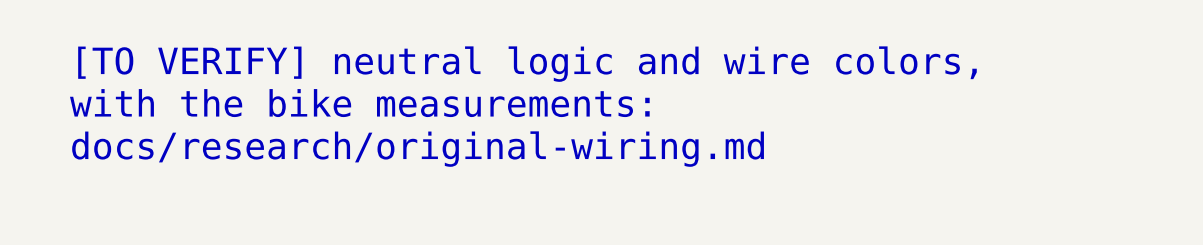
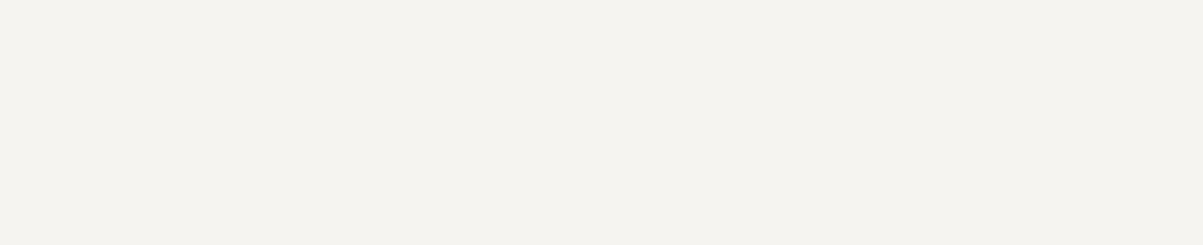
text: [TO VERIFY] neutral logic and wire colors, (527, 64) -> none
text: with the bike measurements: (359, 103) -> none
text: docs/research/original-wiring.md (418, 149) -> none

